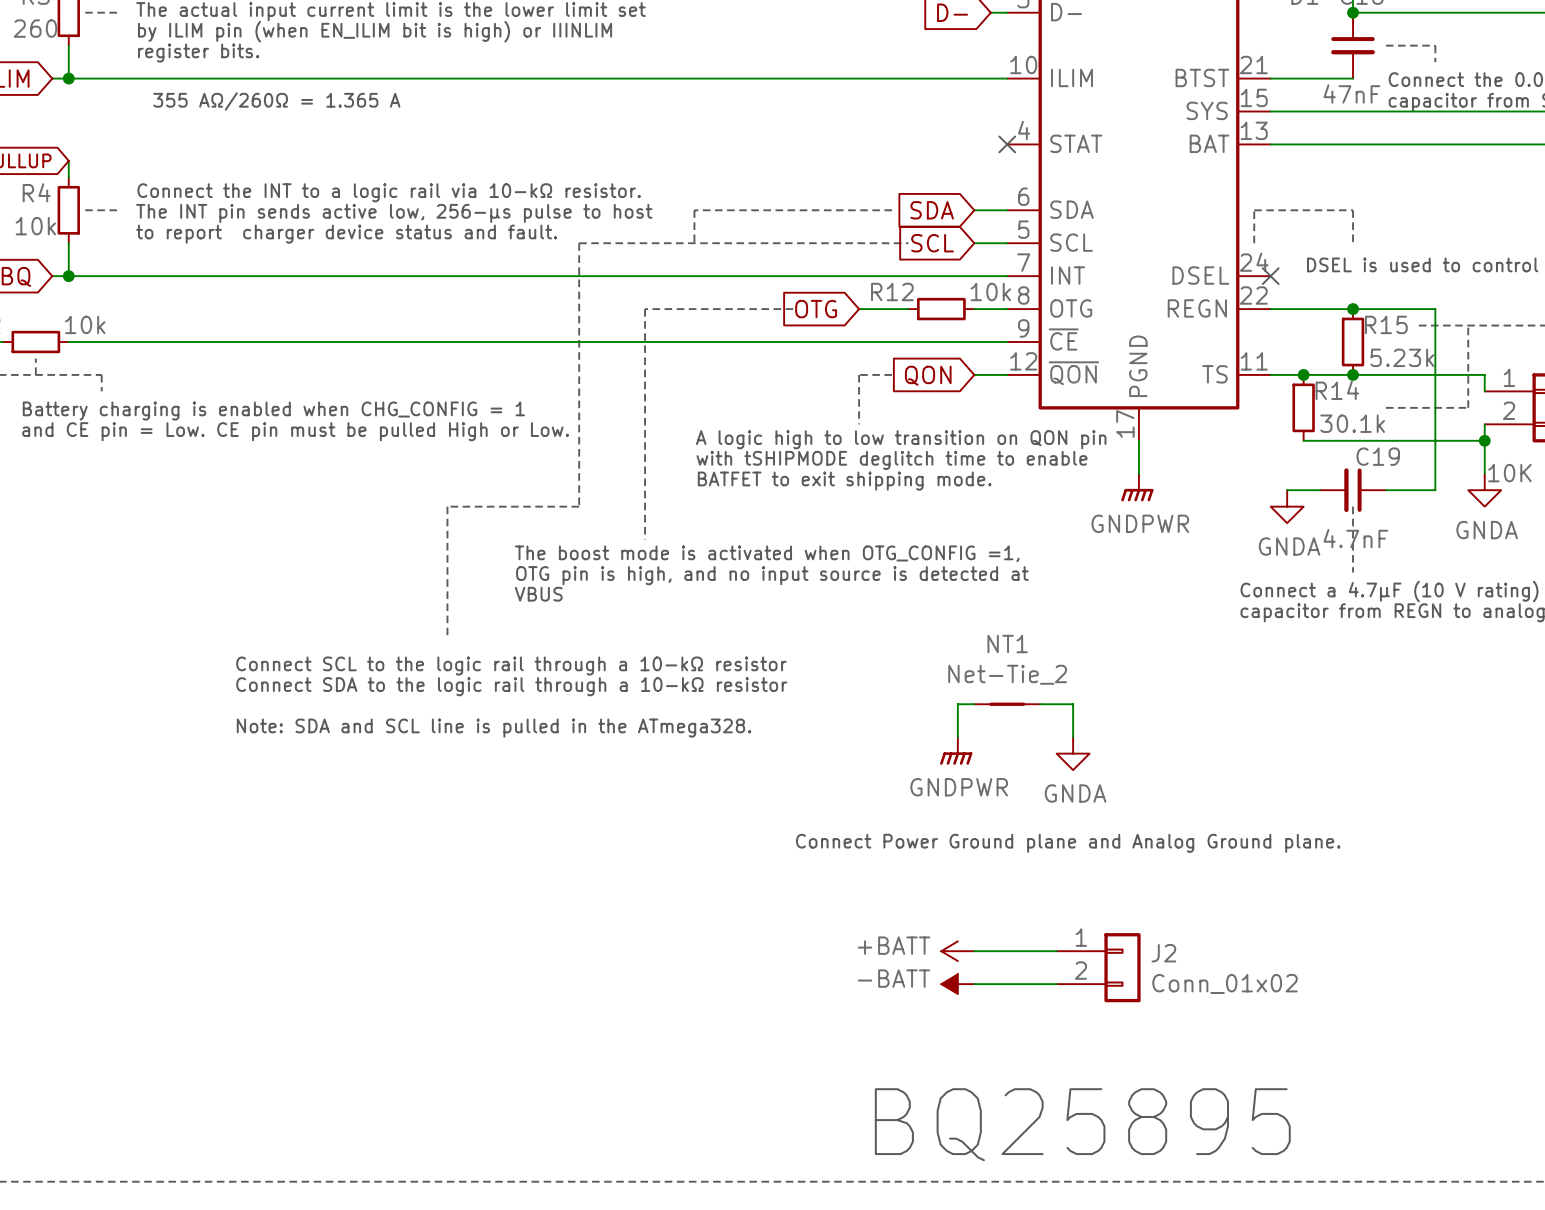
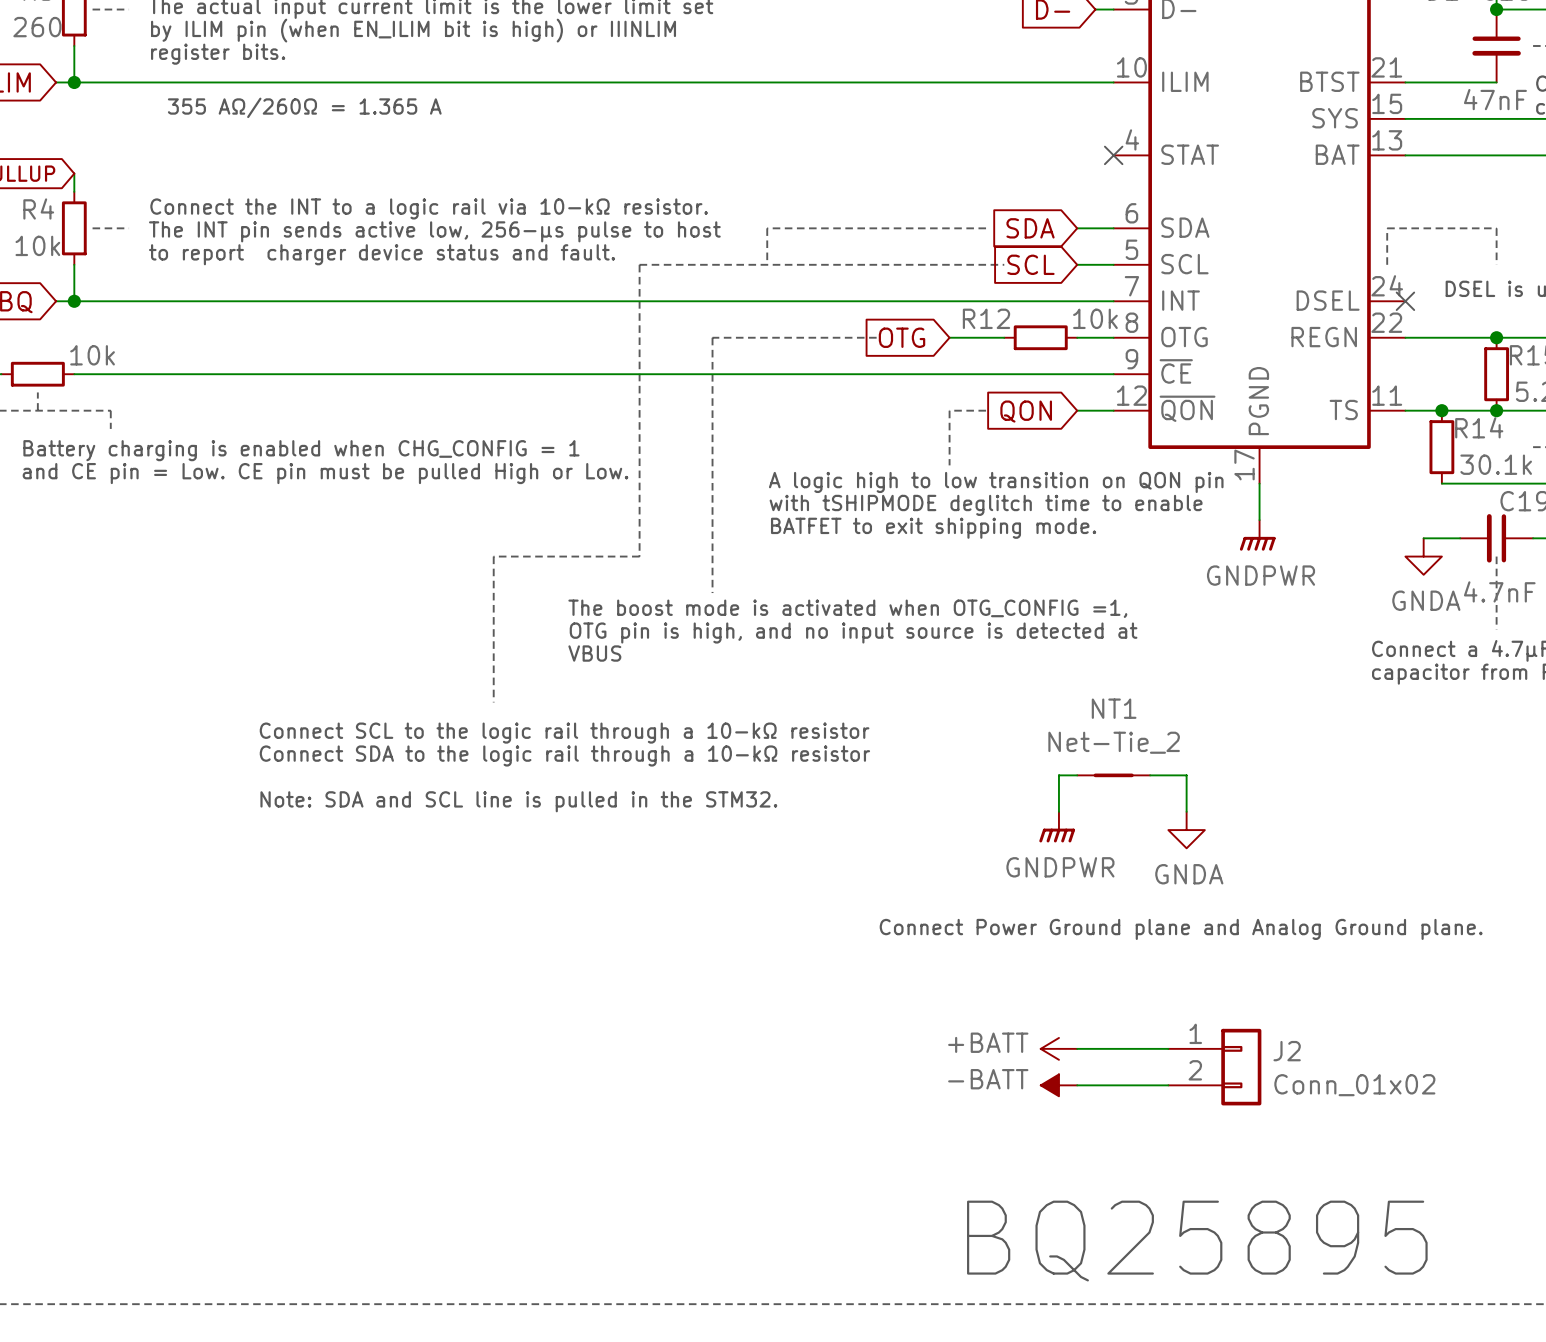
text: Note: SDA and SCL line is pulled in the ATmega328. (494, 728) -> Note: SDA and SCL line is pulled in the STM32. (518, 801)

